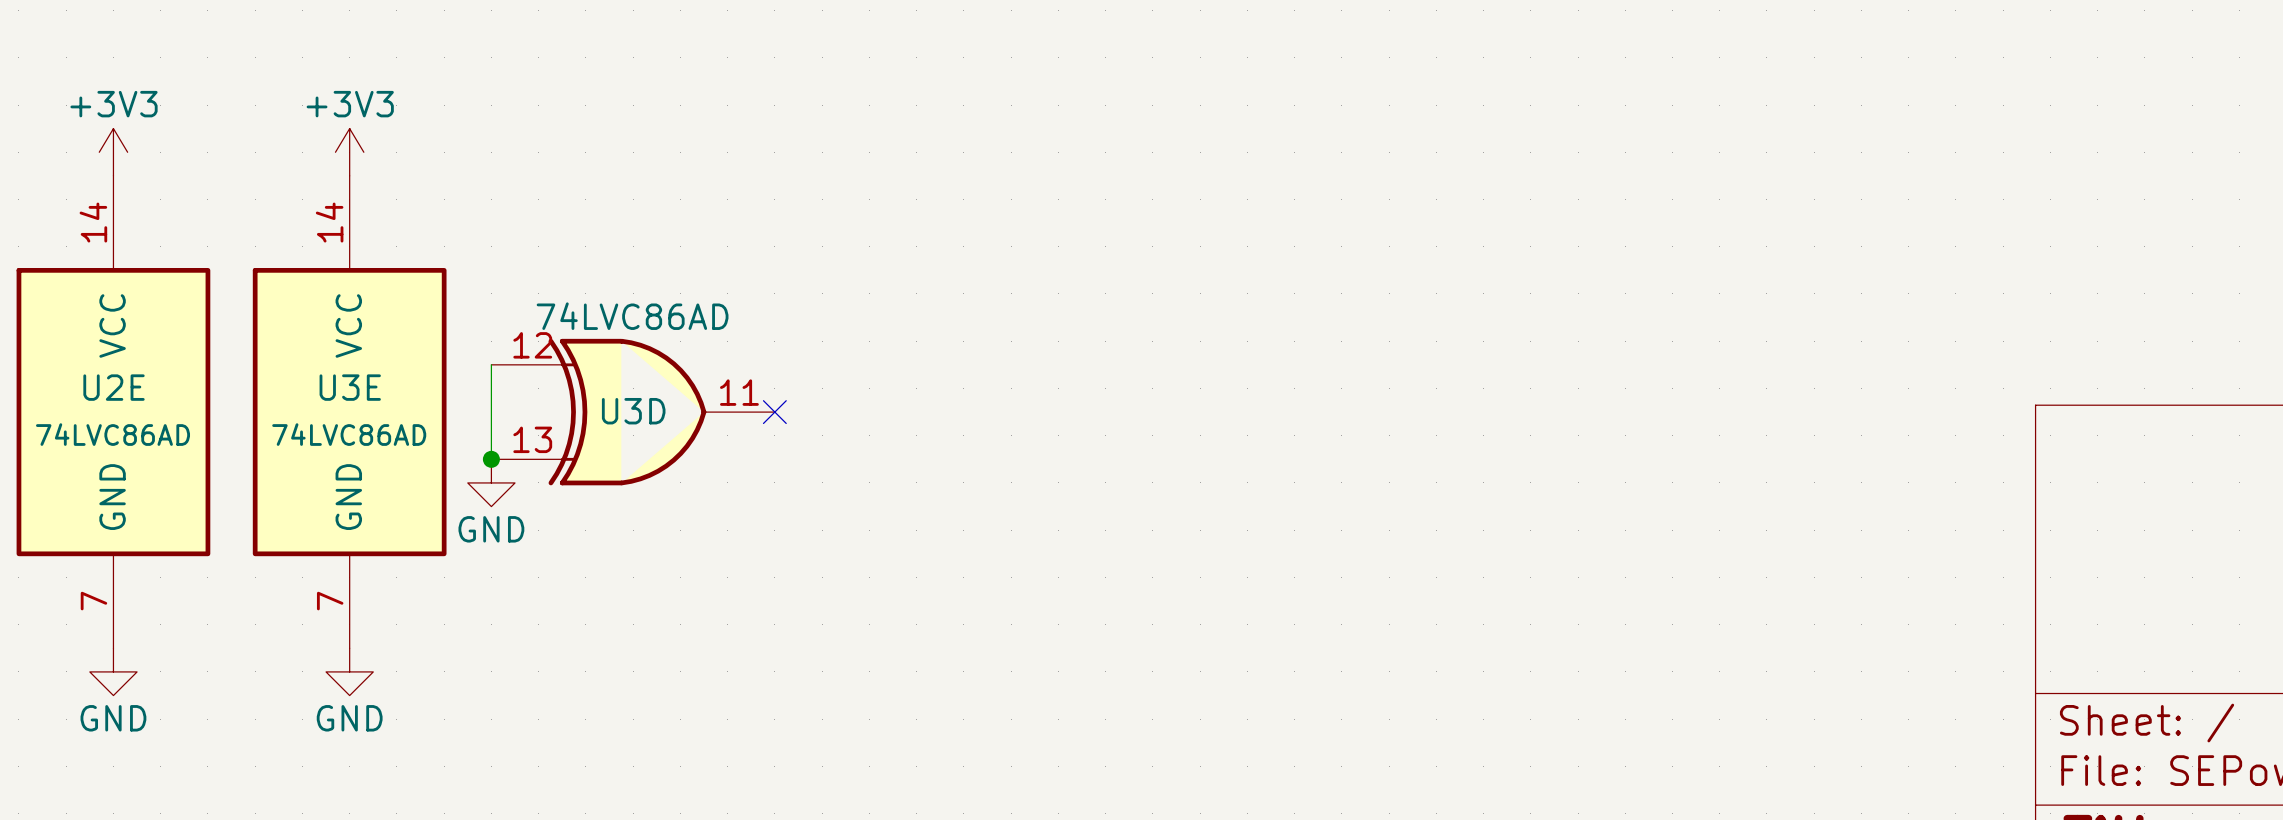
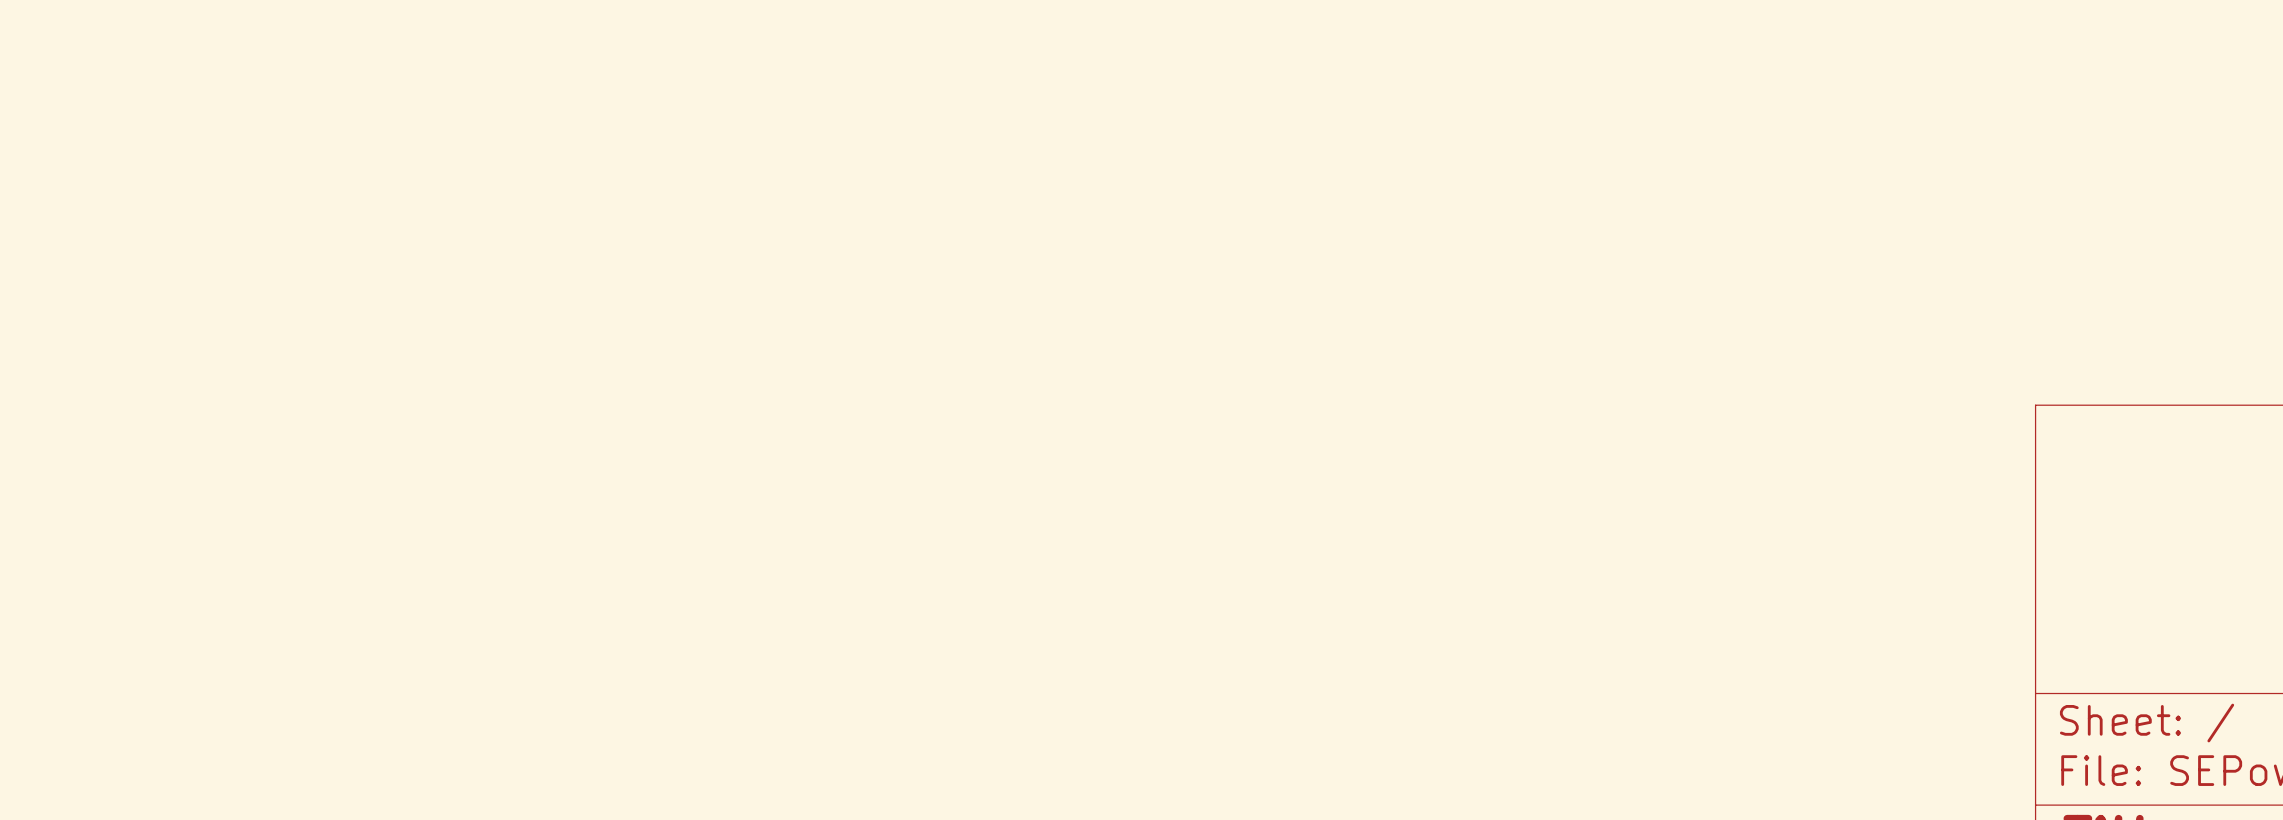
power symbol: +3V3 (113, 152) -> none
power symbol: +3V3 (349, 152) -> none
wire: (491, 364) (491, 459) -> none
U2E: 74LVC86AD (113, 412) -> none
U3E: 74LVC86AD (349, 412) -> none
U3D: 74LVC86AD (633, 412) -> none
no-connect mark: (774, 412) -> none
junction: (491, 459) -> none
power symbol: GND (491, 482) -> none
power symbol: GND (113, 671) -> none
power symbol: GND (349, 671) -> none

